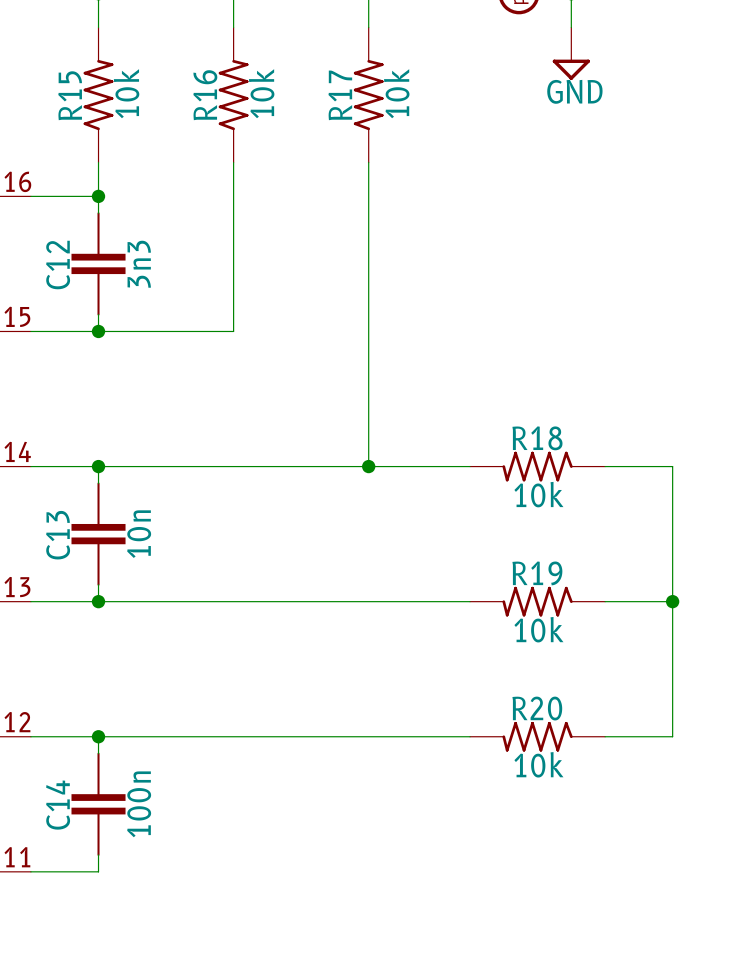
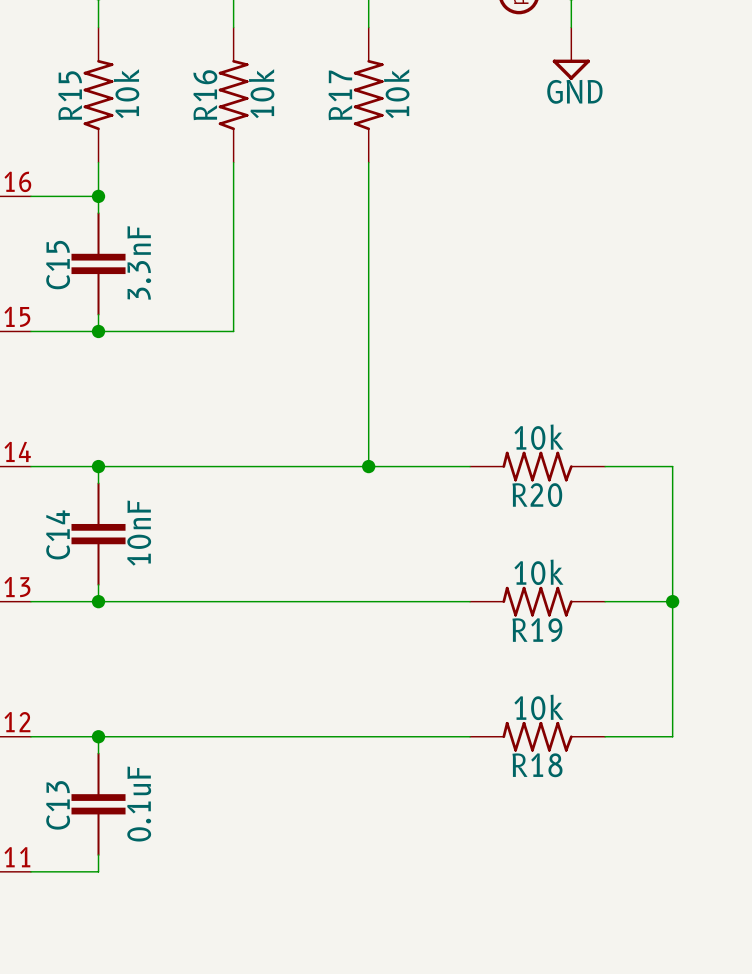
C12 value: 3n3 (139, 264) -> 3.3nF (139, 262)
C12 name: C12 (58, 265) -> C15 (58, 265)
R18 flip: as is (537, 466) -> up-down (537, 736)
R18 position: (537, 466) -> (537, 736)
C13 value: 10n (139, 534) -> 10nF (139, 533)
C13 name: C13 (58, 535) -> C14 (58, 534)
R19 flip: as is (537, 601) -> up-down (537, 601)
R20 flip: as is (537, 736) -> up-down (537, 466)
R20 position: (537, 736) -> (537, 466)
C14 value: 100n (139, 804) -> 0.1uF (139, 804)
C14 name: C14 (58, 805) -> C13 (58, 805)

